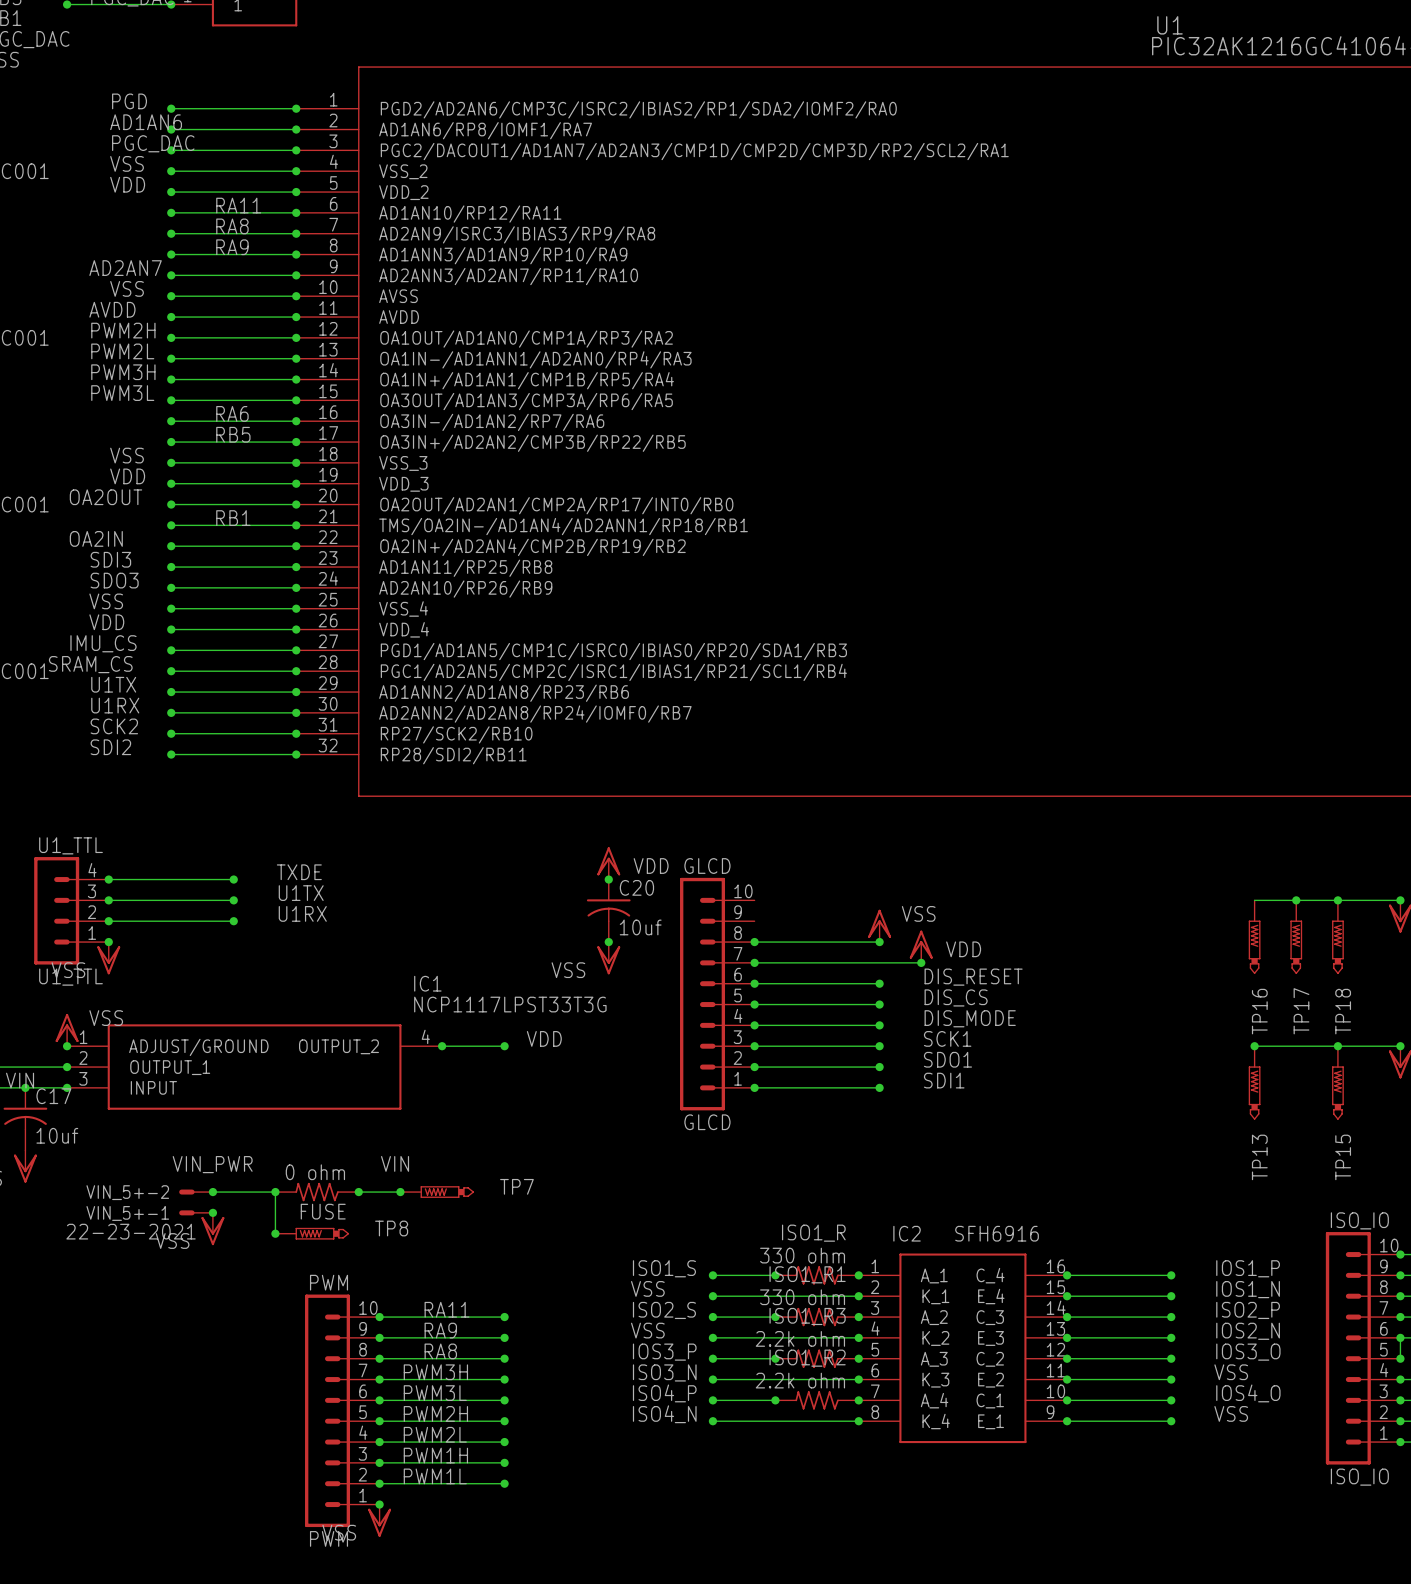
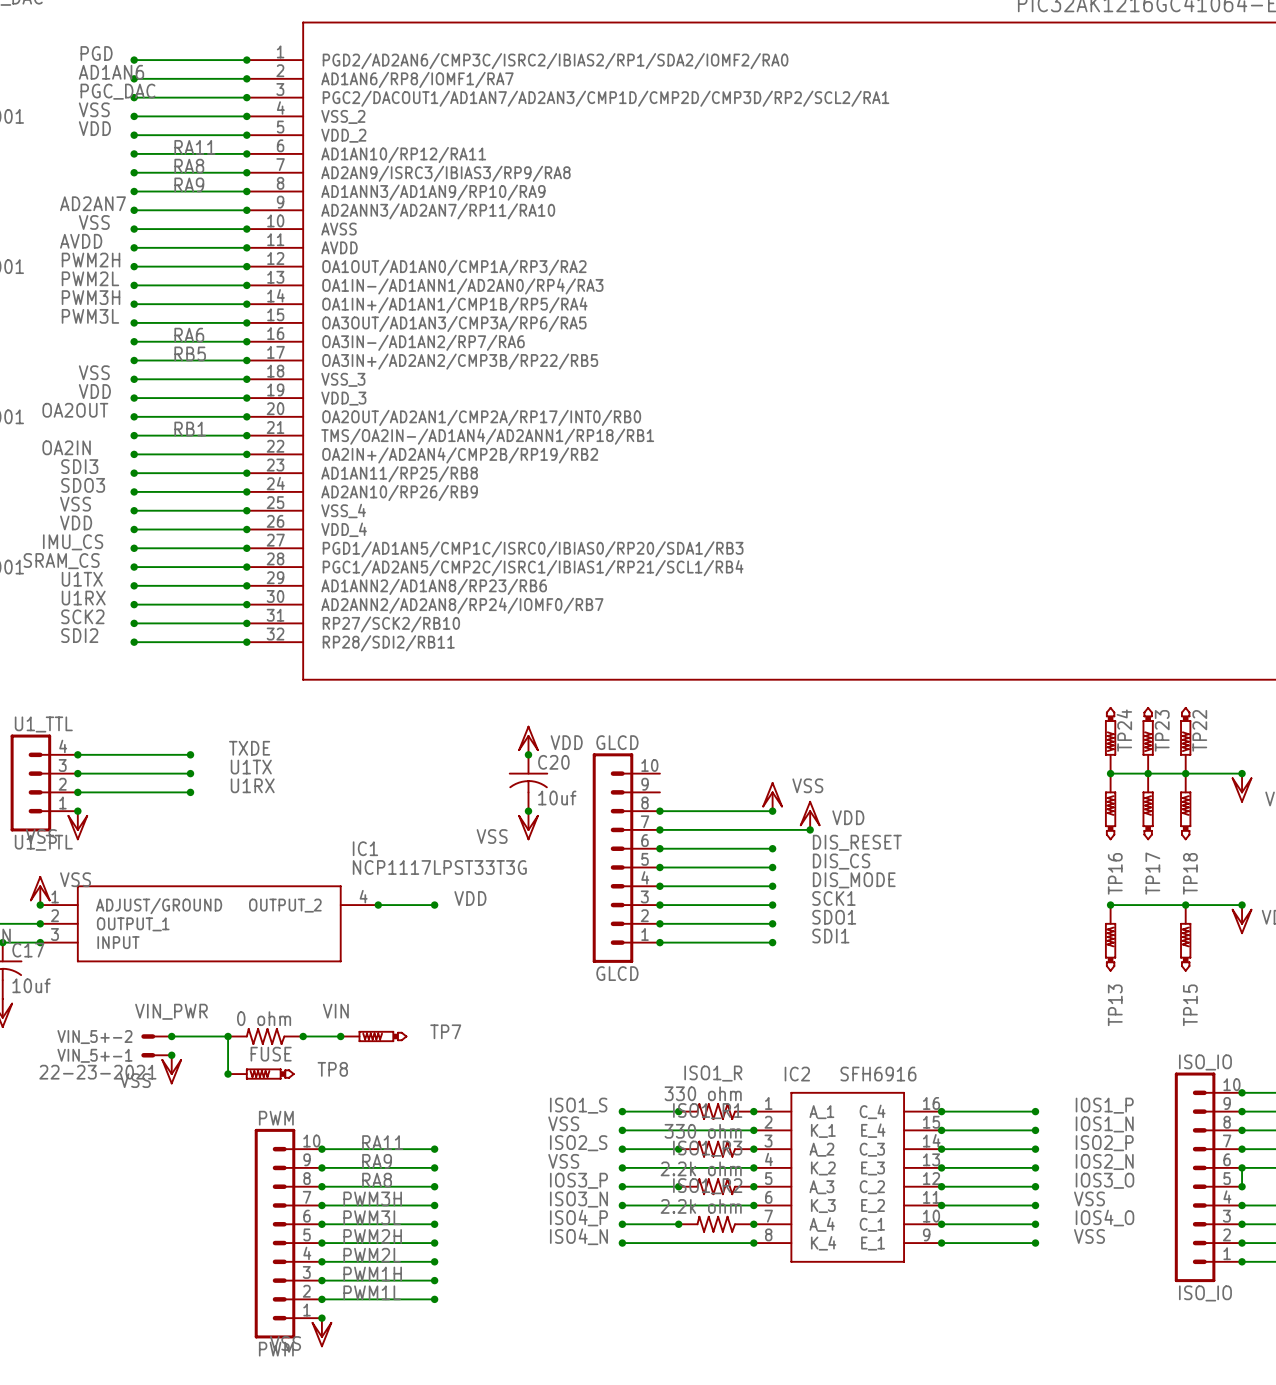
TP24: none -> (1110, 740)
TP23: none -> (1148, 740)
TP22: none -> (1185, 740)
junction: none -> (1110, 773)

